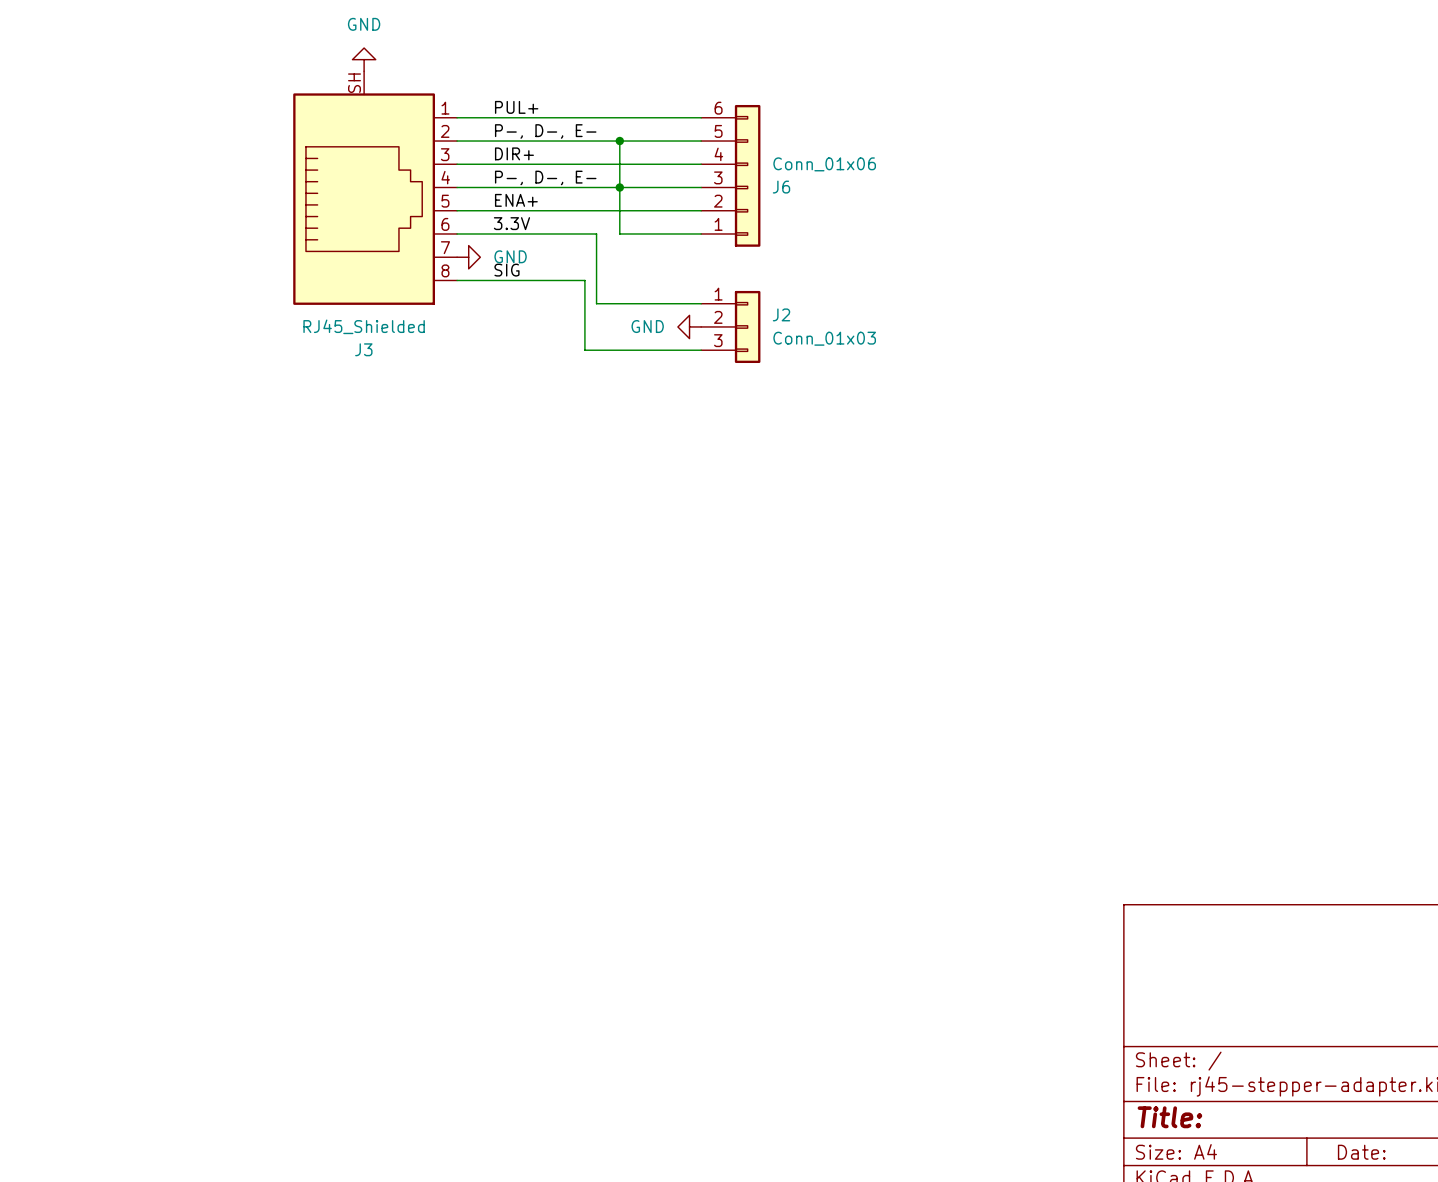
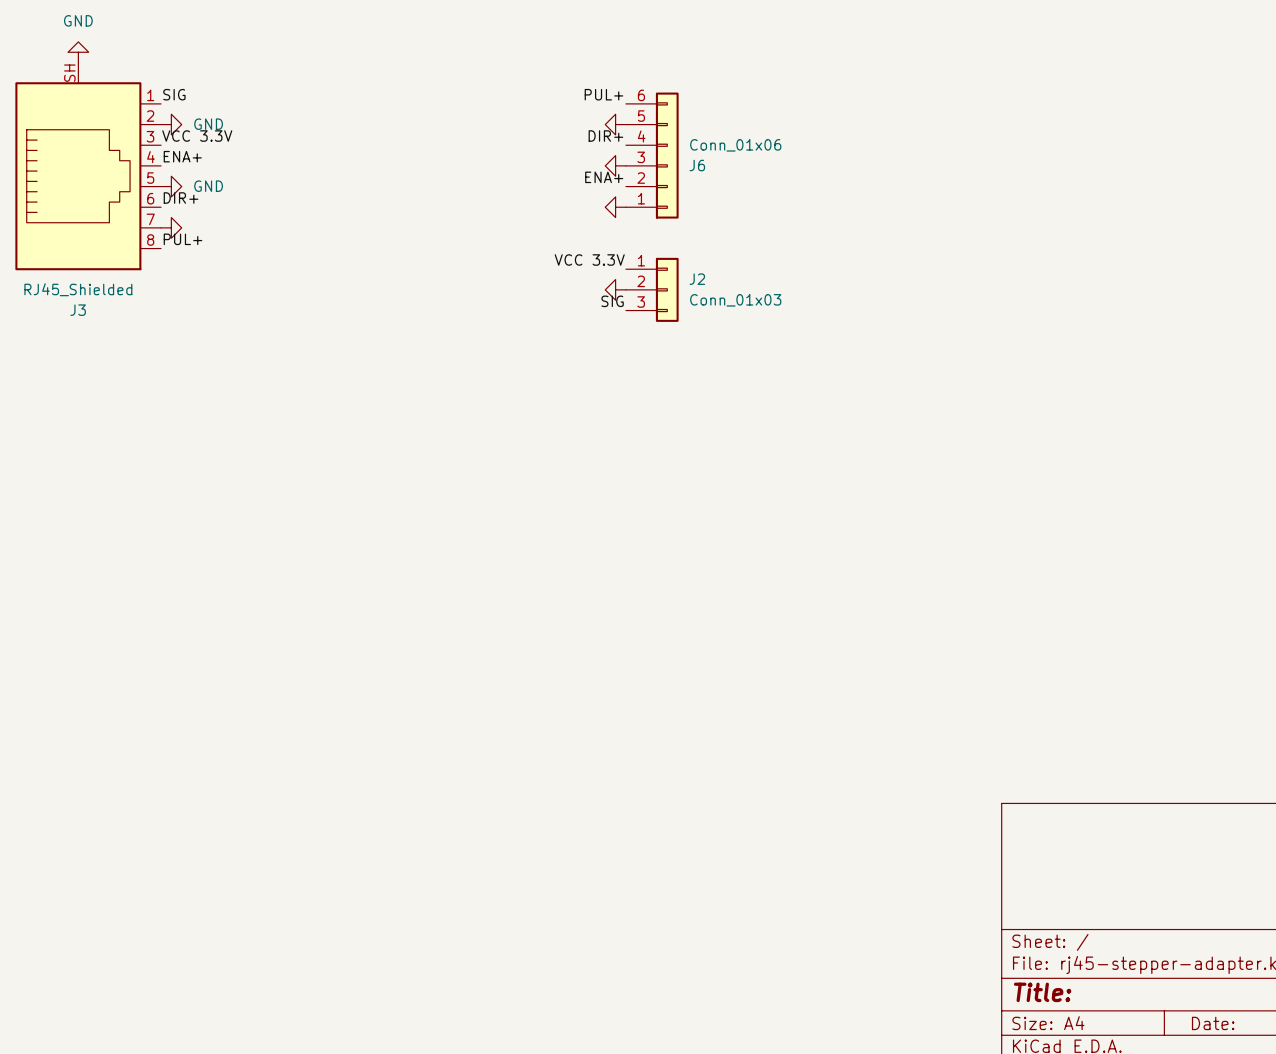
power symbol: none -> GND (78, 52)
power symbol: GND (364, 59) -> none
label: none -> SIG (174, 94)
label: PUL+ (516, 107) -> none
label: none -> PUL+ (603, 94)
wire: (457, 117) (701, 117) -> none
label: P-, D-, E- (545, 131) -> none
power symbol: none -> GND (171, 124)
wire: (457, 141) (701, 141) -> none
wire: (619, 141) (619, 233) (701, 233) -> none
junction: (619, 141) -> none
power symbol: none -> (615, 124)
label: none -> VCC 3.3V (197, 136)
label: DIR+ (514, 153) -> none
label: none -> DIR+ (605, 136)
wire: (457, 164) (701, 164) -> none
label: none -> ENA+ (182, 156)
label: P-, D-, E- (545, 177) -> none
wire: (457, 187) (701, 187) -> none
junction: (619, 187) -> none
power symbol: none -> (615, 165)
J3 position: (375, 188) -> (88, 166)
label: ENA+ (516, 200) -> none
label: none -> ENA+ (604, 177)
power symbol: none -> GND (171, 186)
wire: (457, 210) (701, 210) -> none
label: none -> DIR+ (181, 198)
label: 3.3V (511, 223) -> none
wire: (457, 233) (596, 233) (596, 303) (701, 303) -> none
power symbol: none -> (615, 207)
power symbol: none -> (171, 227)
power symbol: GND (468, 257) -> none
label: none -> PUL+ (183, 239)
label: SIG (506, 270) -> none
wire: (457, 280) (584, 280) (584, 350) (701, 350) -> none
label: none -> VCC 3.3V (589, 259)
power symbol text: GND (647, 326) -> none
label: none -> SIG (612, 301)

